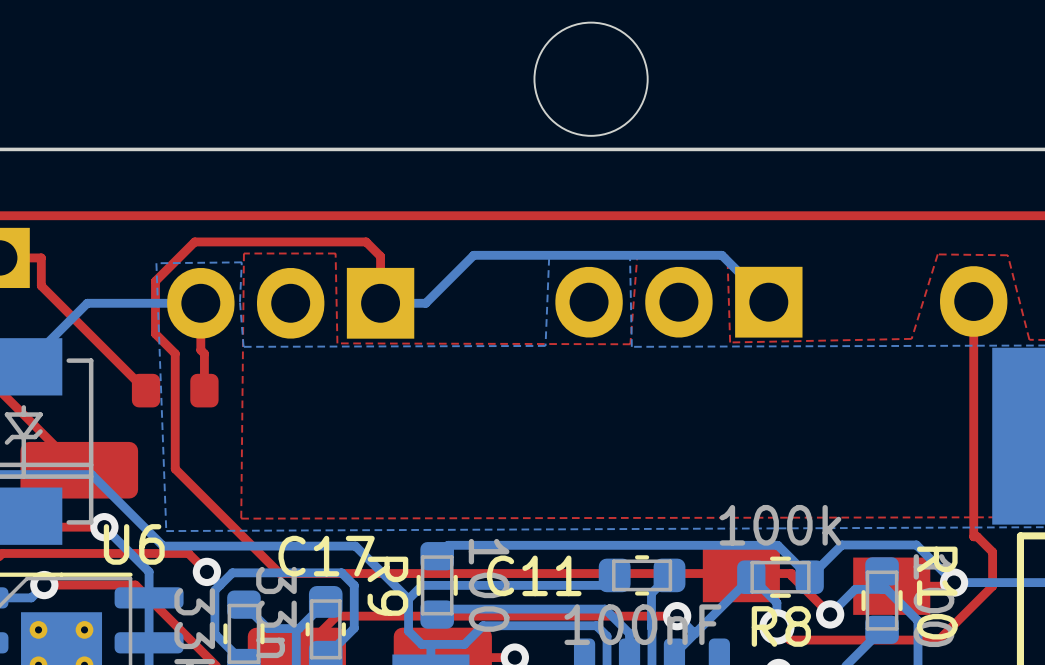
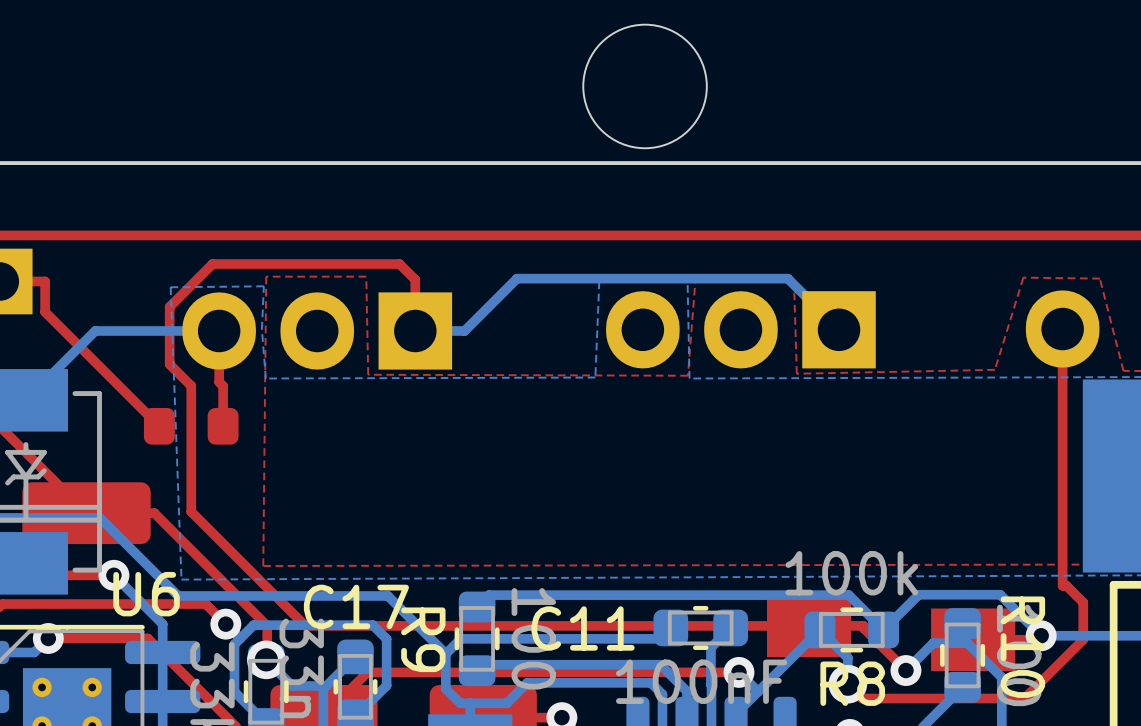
top track: none -> (86, 513) (154, 513) (267, 625) (266, 659)
via: none -> (266, 659)

